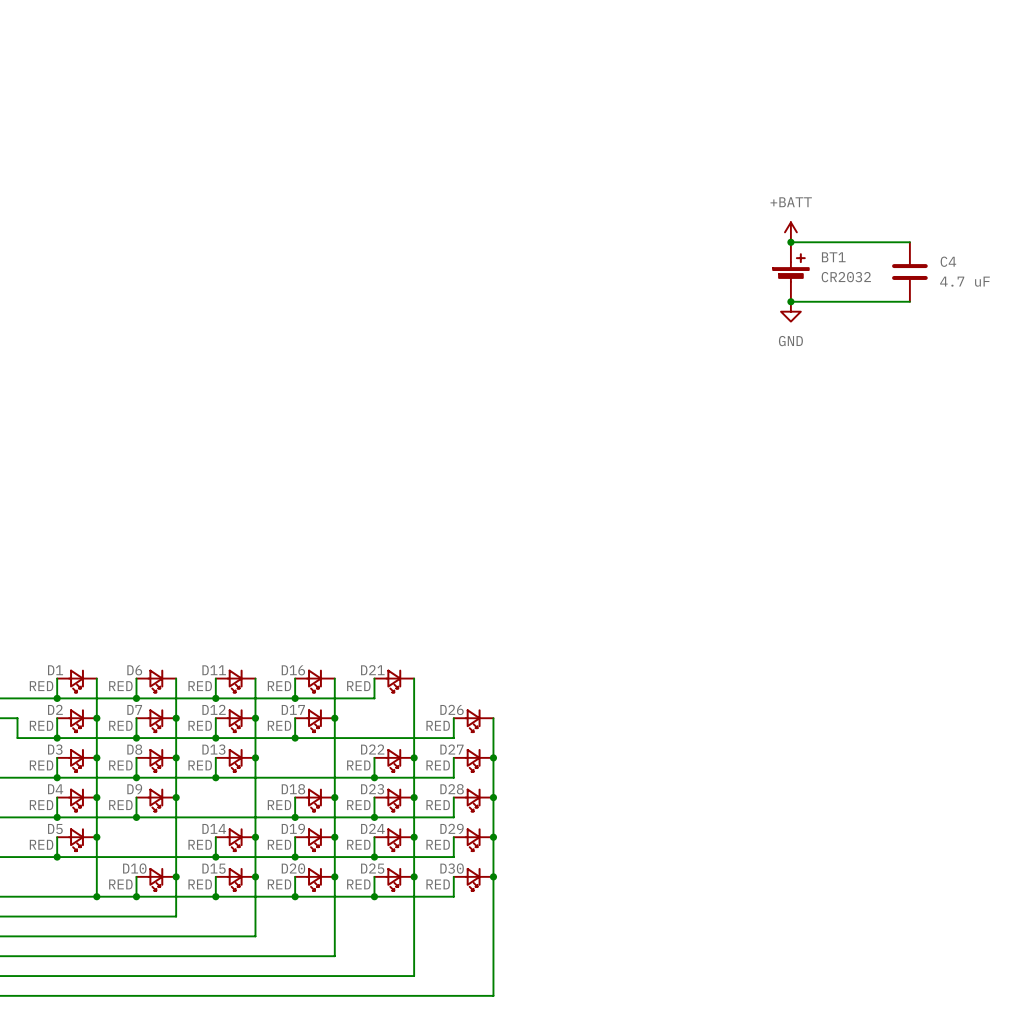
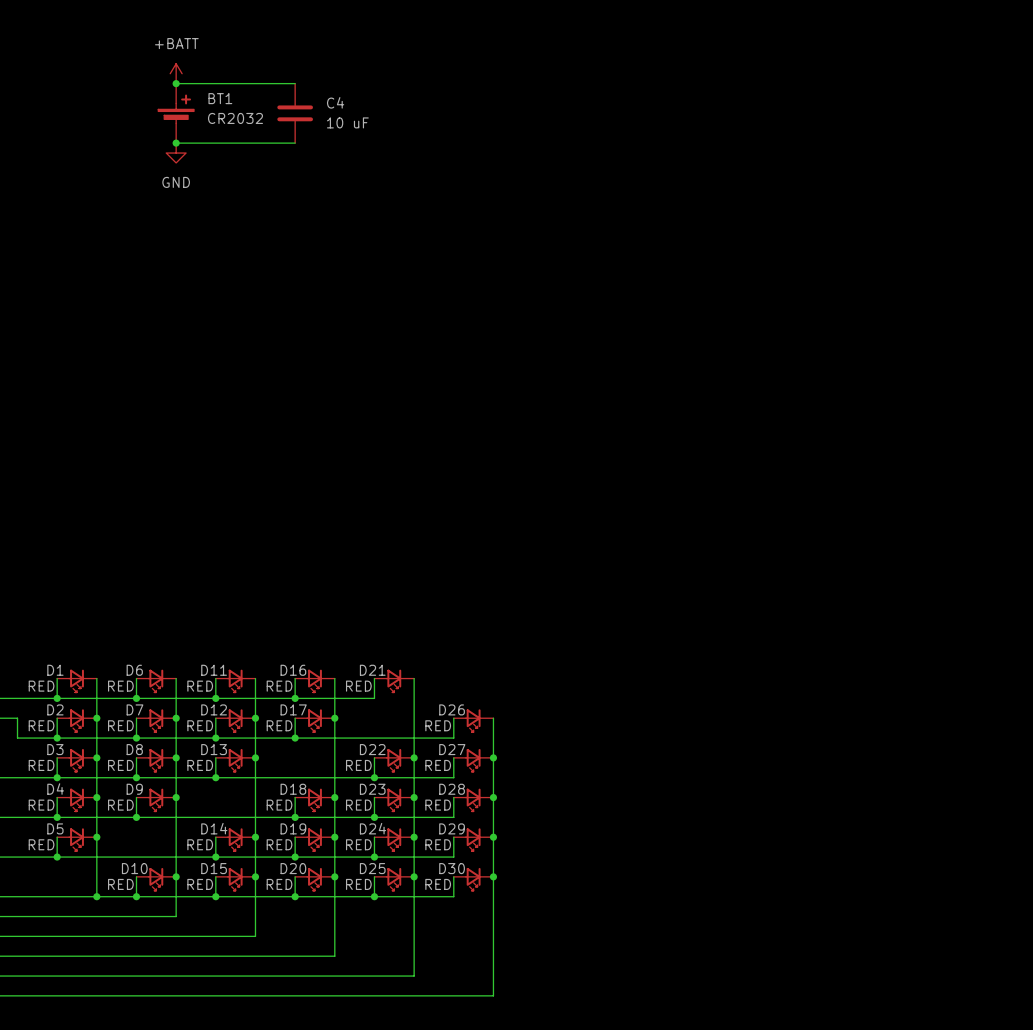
power symbol: none -> +BATT (176, 73)
wire: none -> (176, 83) (295, 83)
junction: none -> (176, 83)
wire: none -> (176, 143) (295, 143)
junction: none -> (176, 143)
power symbol: none -> GND (176, 153)
power symbol: +BATT (790, 232) -> none
wire: (790, 242) (909, 242) -> none
junction: (790, 242) -> none
BT1 position: (790, 272) -> (176, 113)
C4 position: (909, 272) -> (295, 113)
C4 value: 4.7 uF (964, 281) -> 10 uF (347, 122)
wire: (790, 301) (909, 301) -> none
junction: (790, 301) -> none
power symbol: GND (790, 311) -> none

